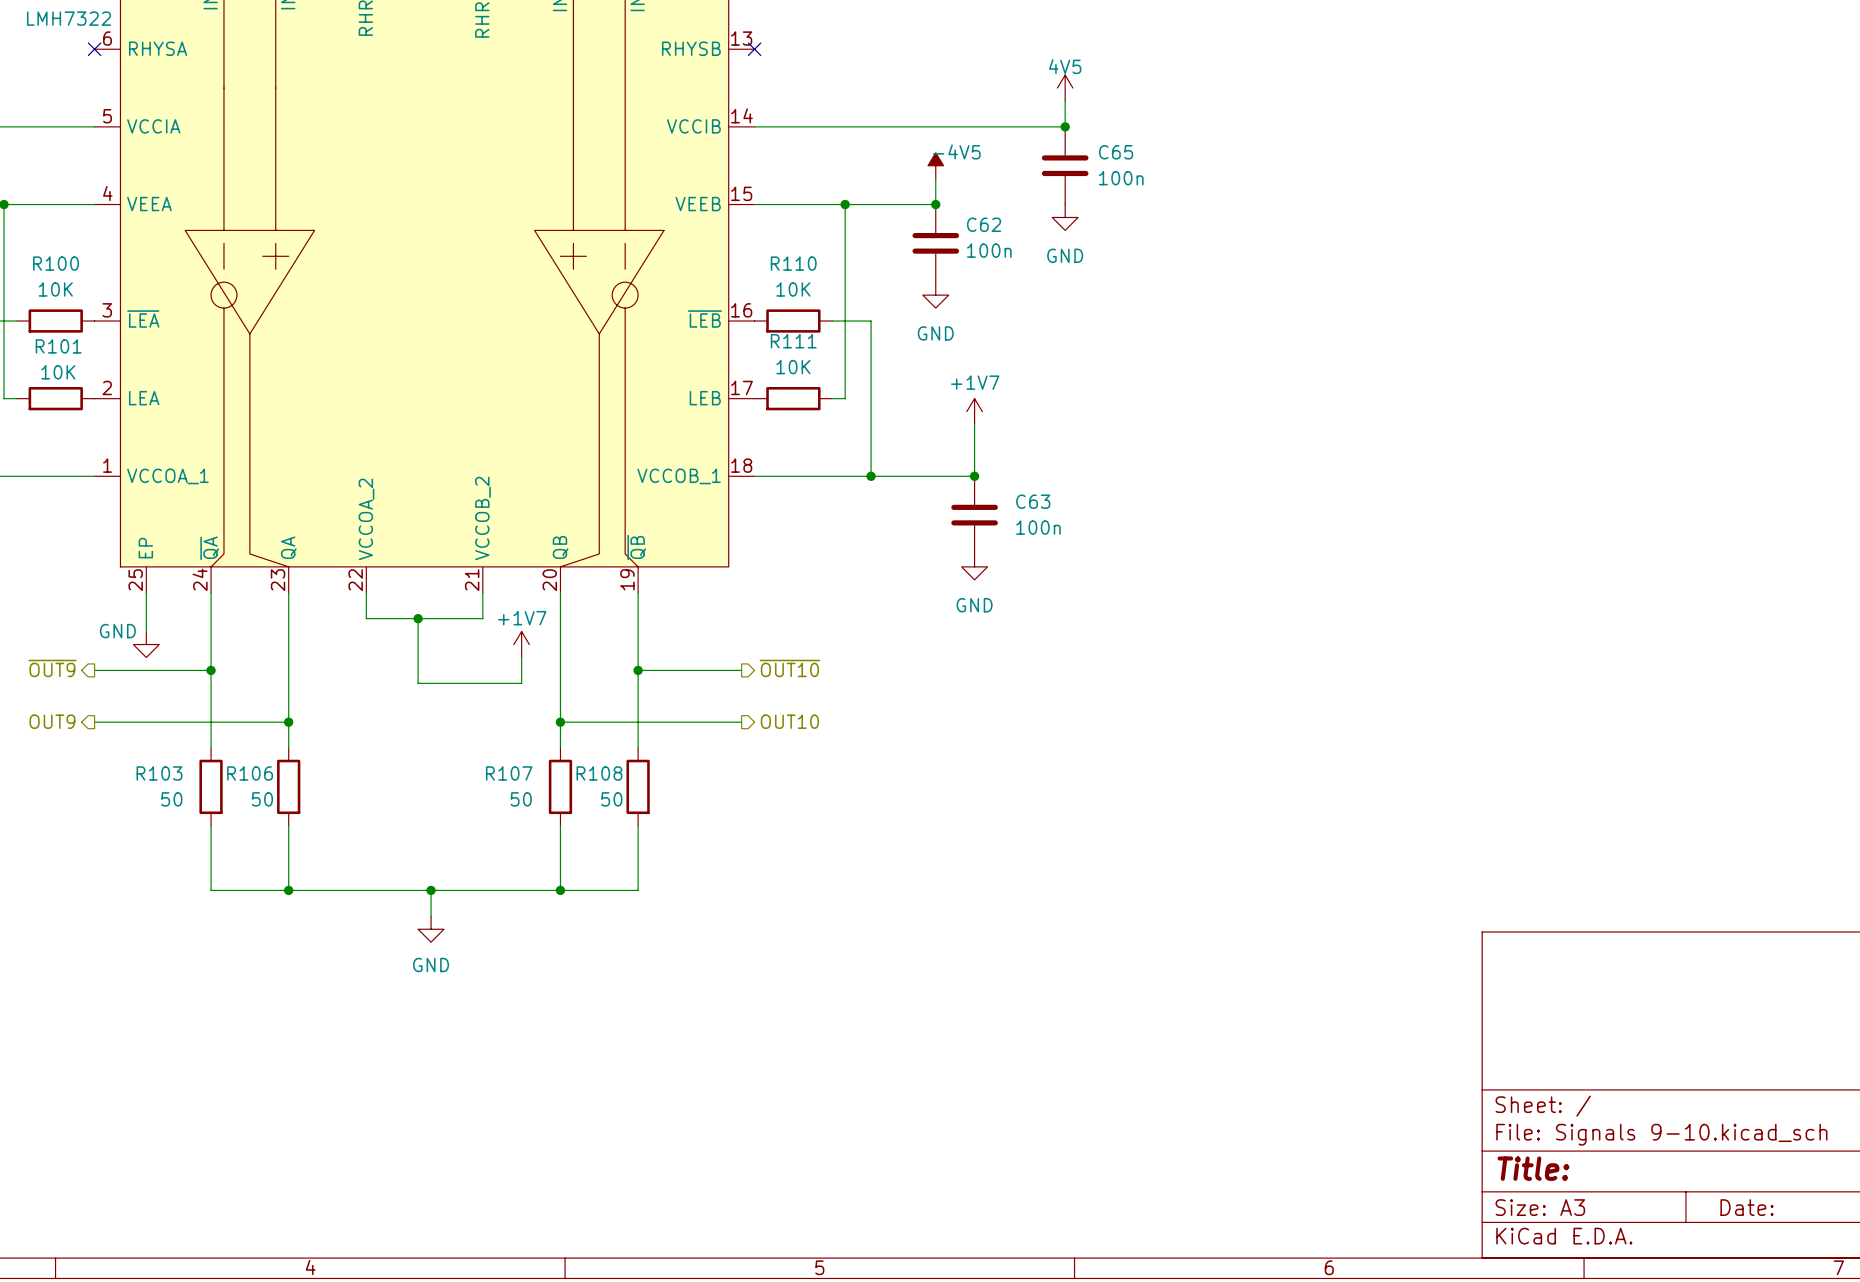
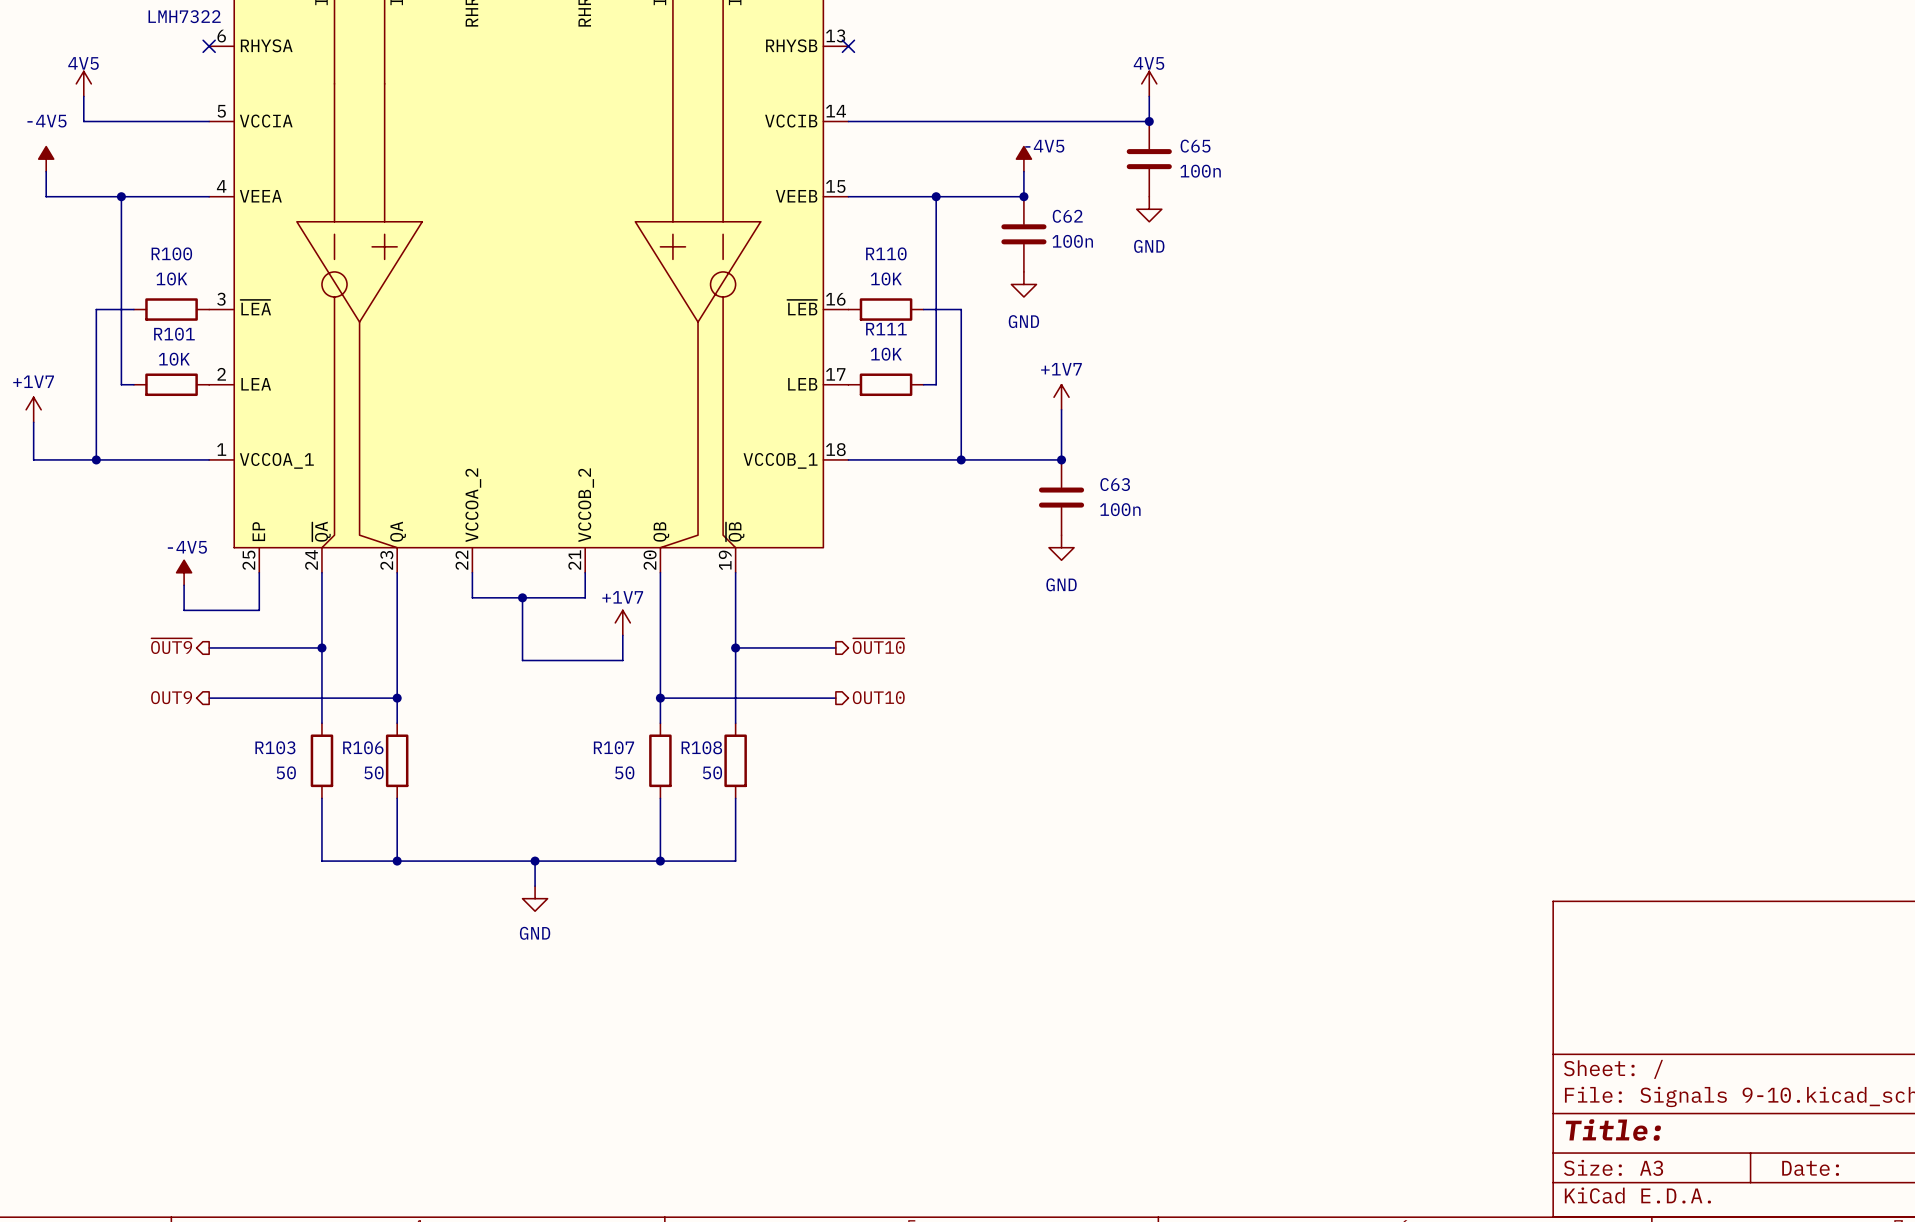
power symbol: none -> -4V5 (184, 572)
wire: none -> (184, 585) (184, 610) (259, 610)
power symbol: GND (146, 644) -> none

